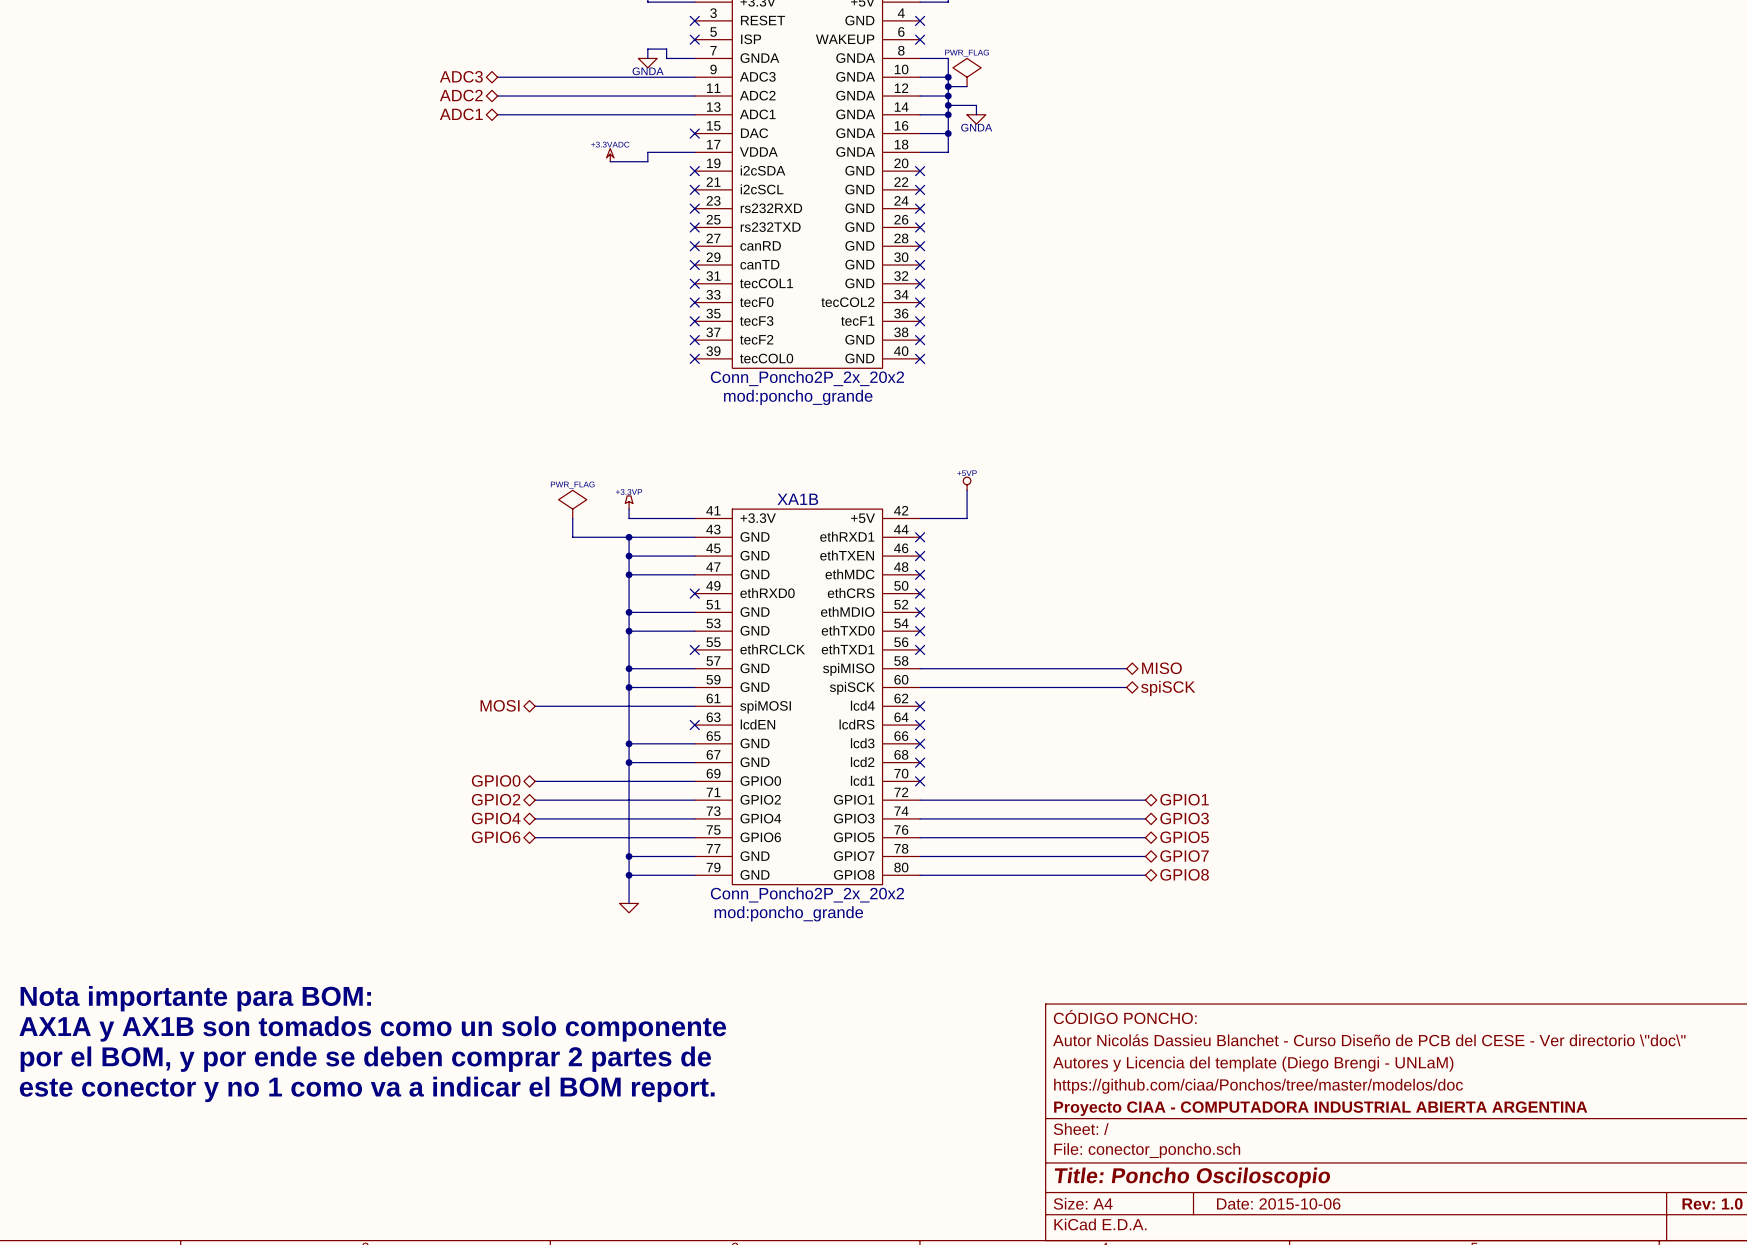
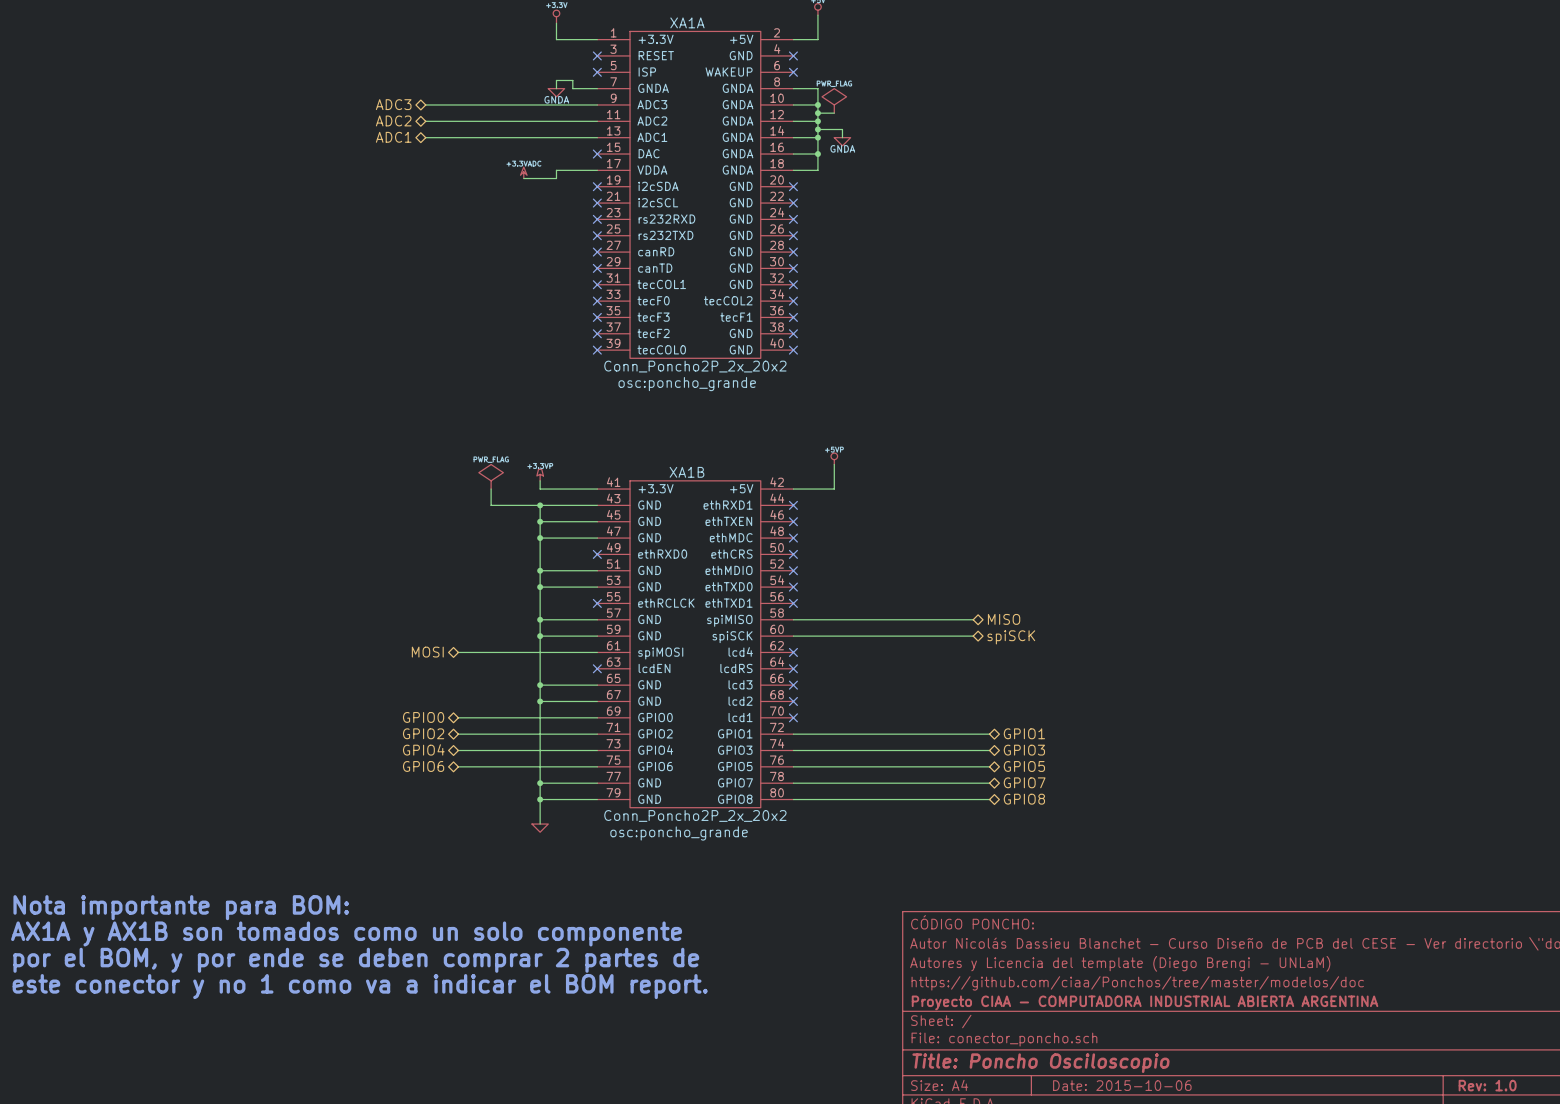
XA1A text: mod:poncho_grande (798, 397) -> osc:poncho_grande (687, 384)
XA1B text: mod:poncho_grande (788, 913) -> osc:poncho_grande (679, 833)

